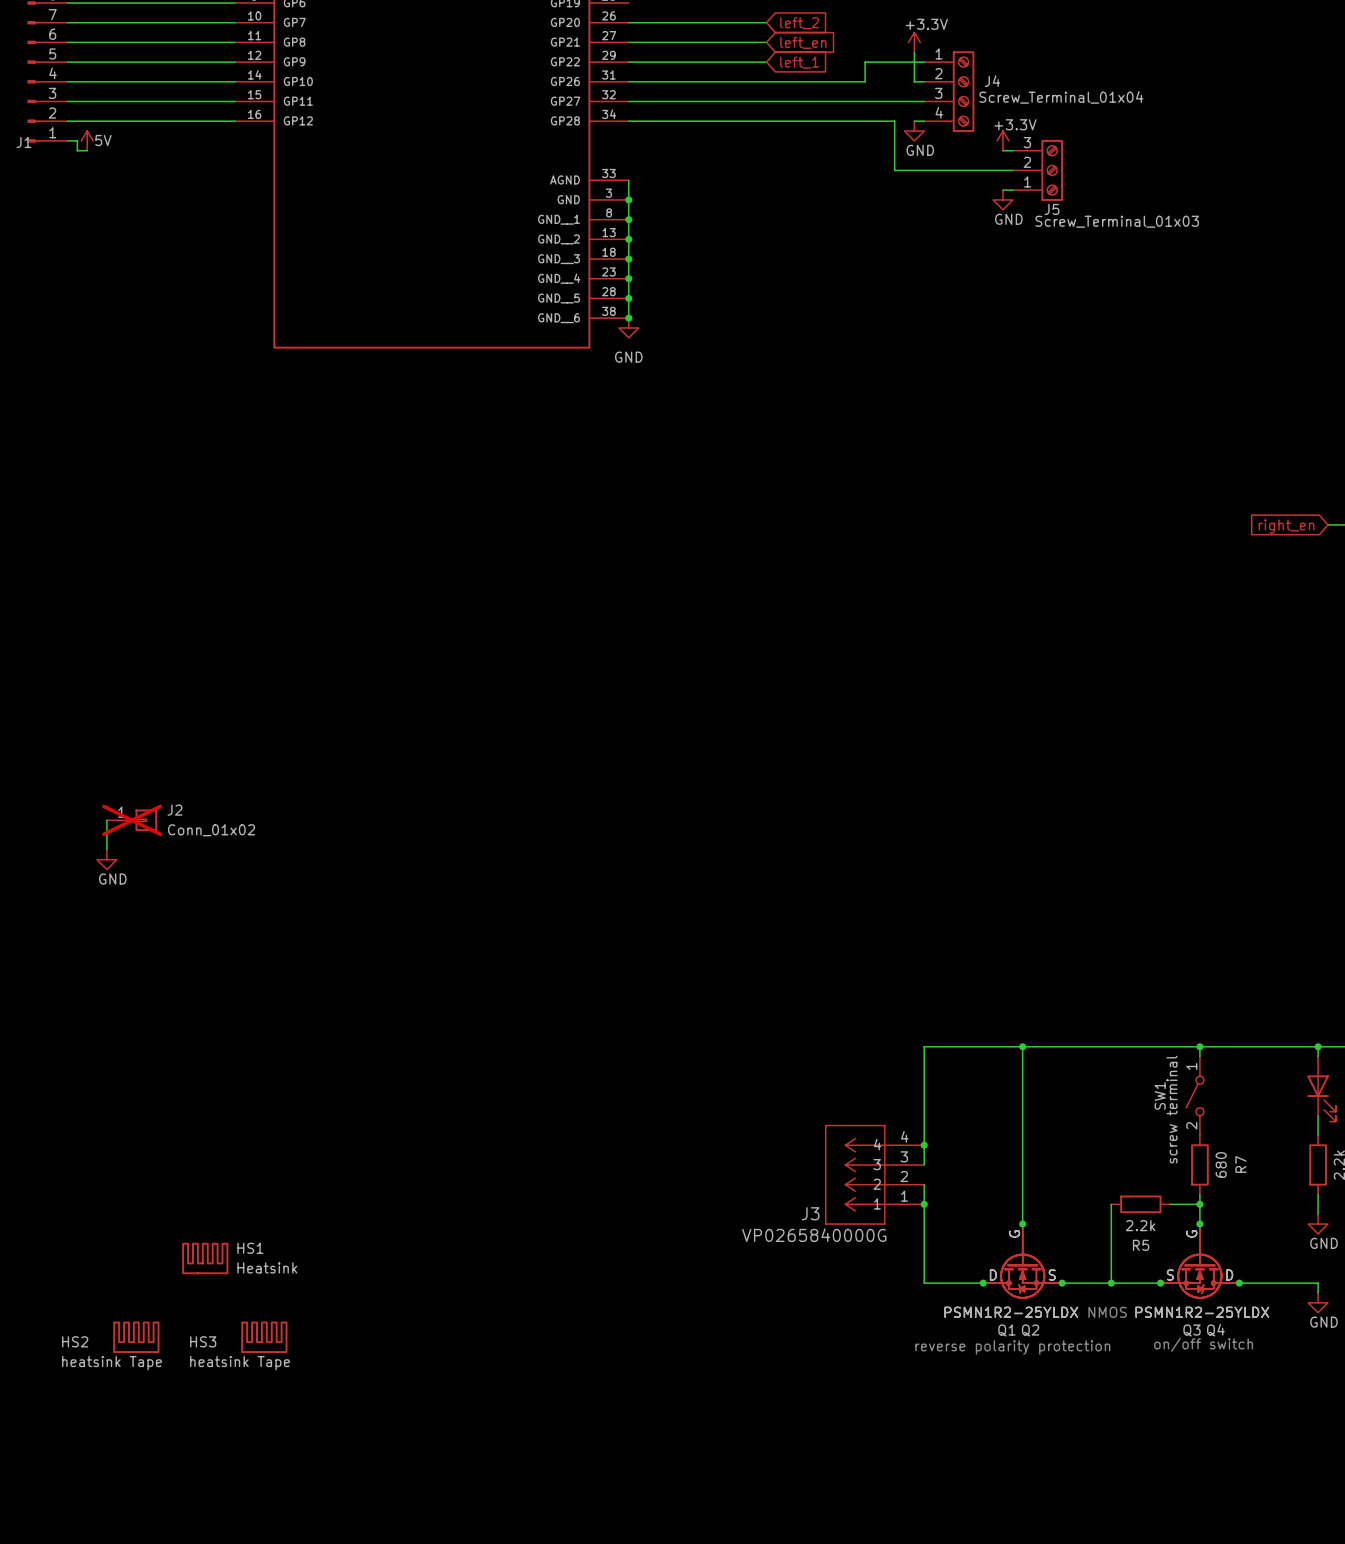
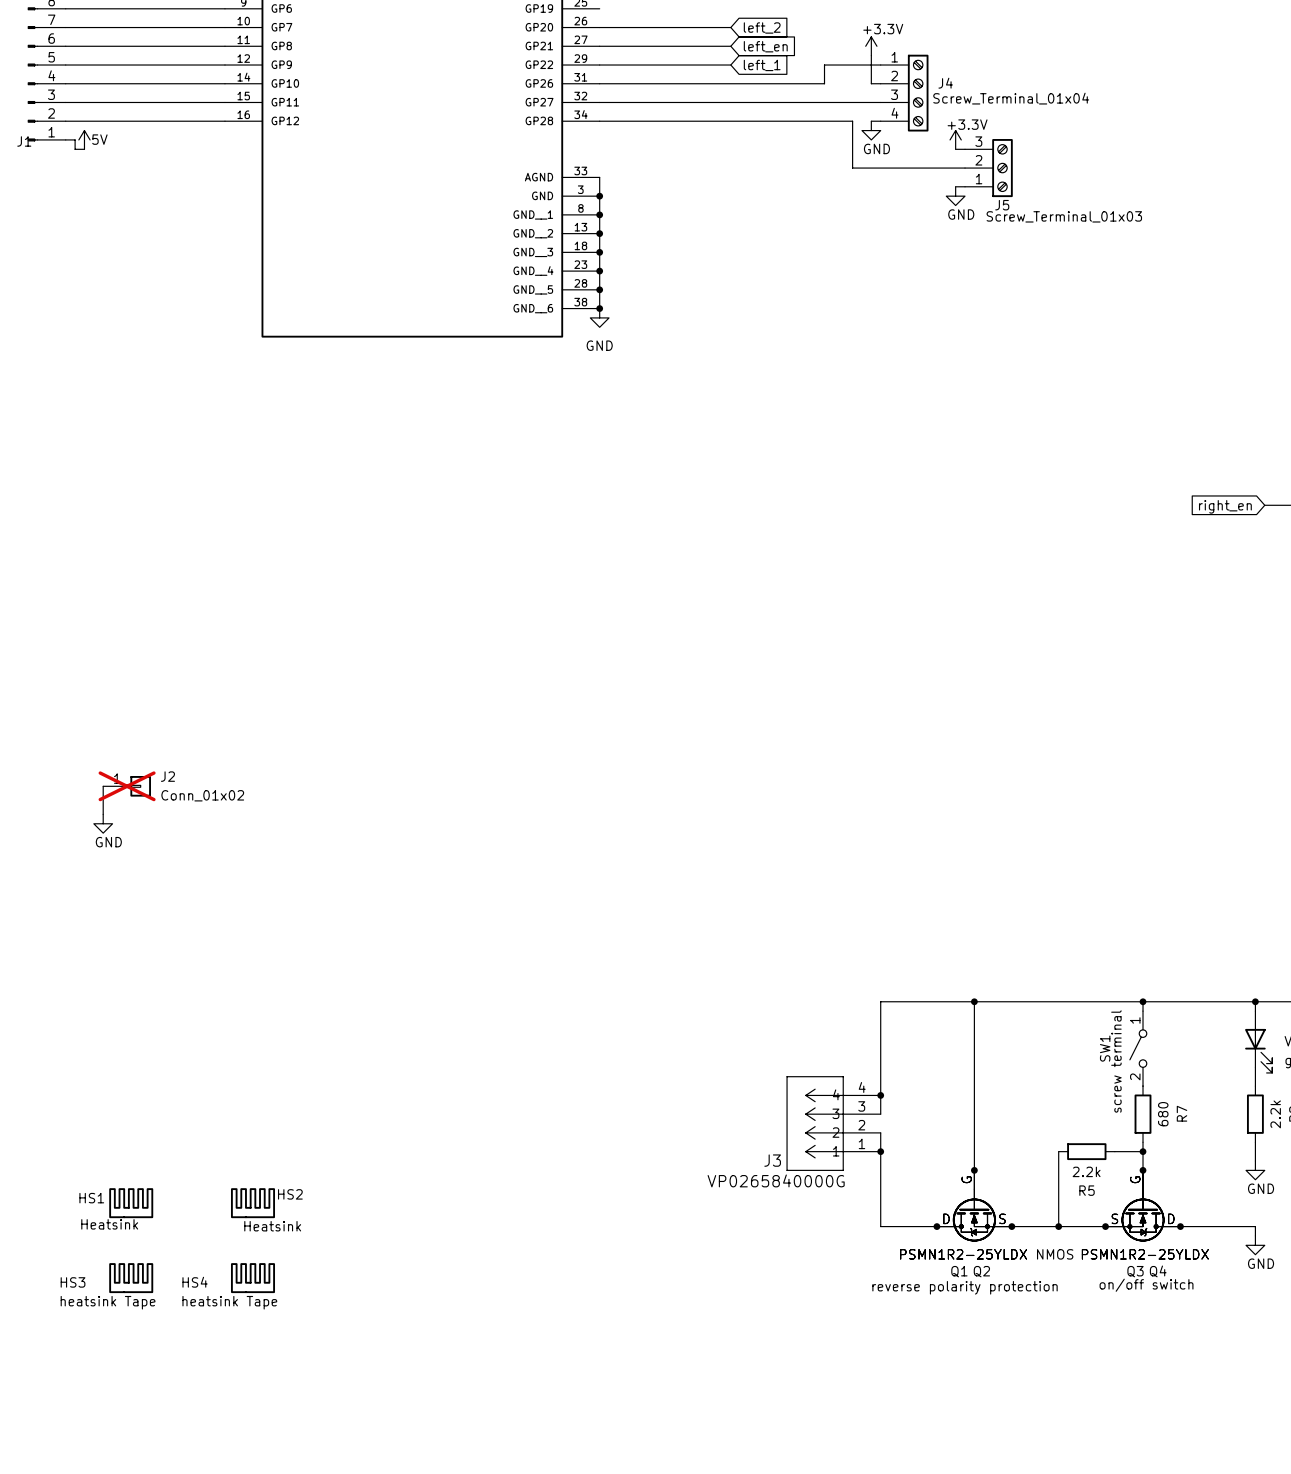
HS1 name position: HS1 (250, 1248) -> HS1 (91, 1198)
HS1 position: (205, 1258) -> (131, 1203)
HS2: none -> Heatsink (252, 1203)
HS1 value position: Heatsink (267, 1267) -> Heatsink (109, 1224)
HS2 name: HS2 (75, 1341) -> HS3 (73, 1282)
HS3 name: HS3 (203, 1341) -> HS4 (195, 1282)

